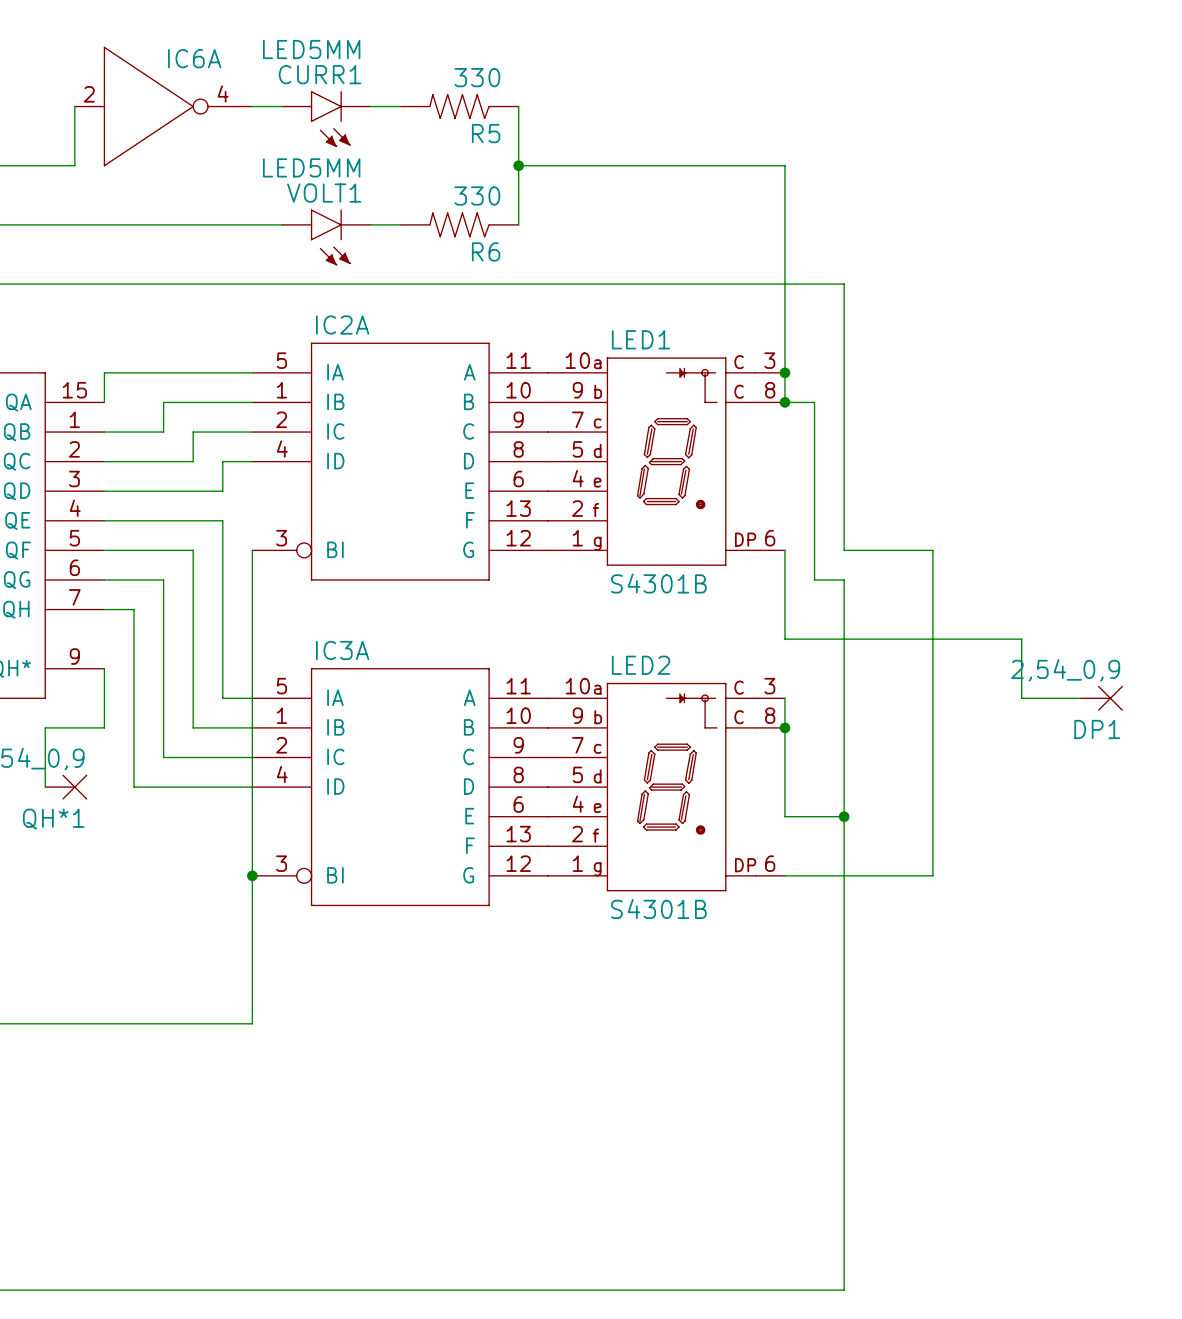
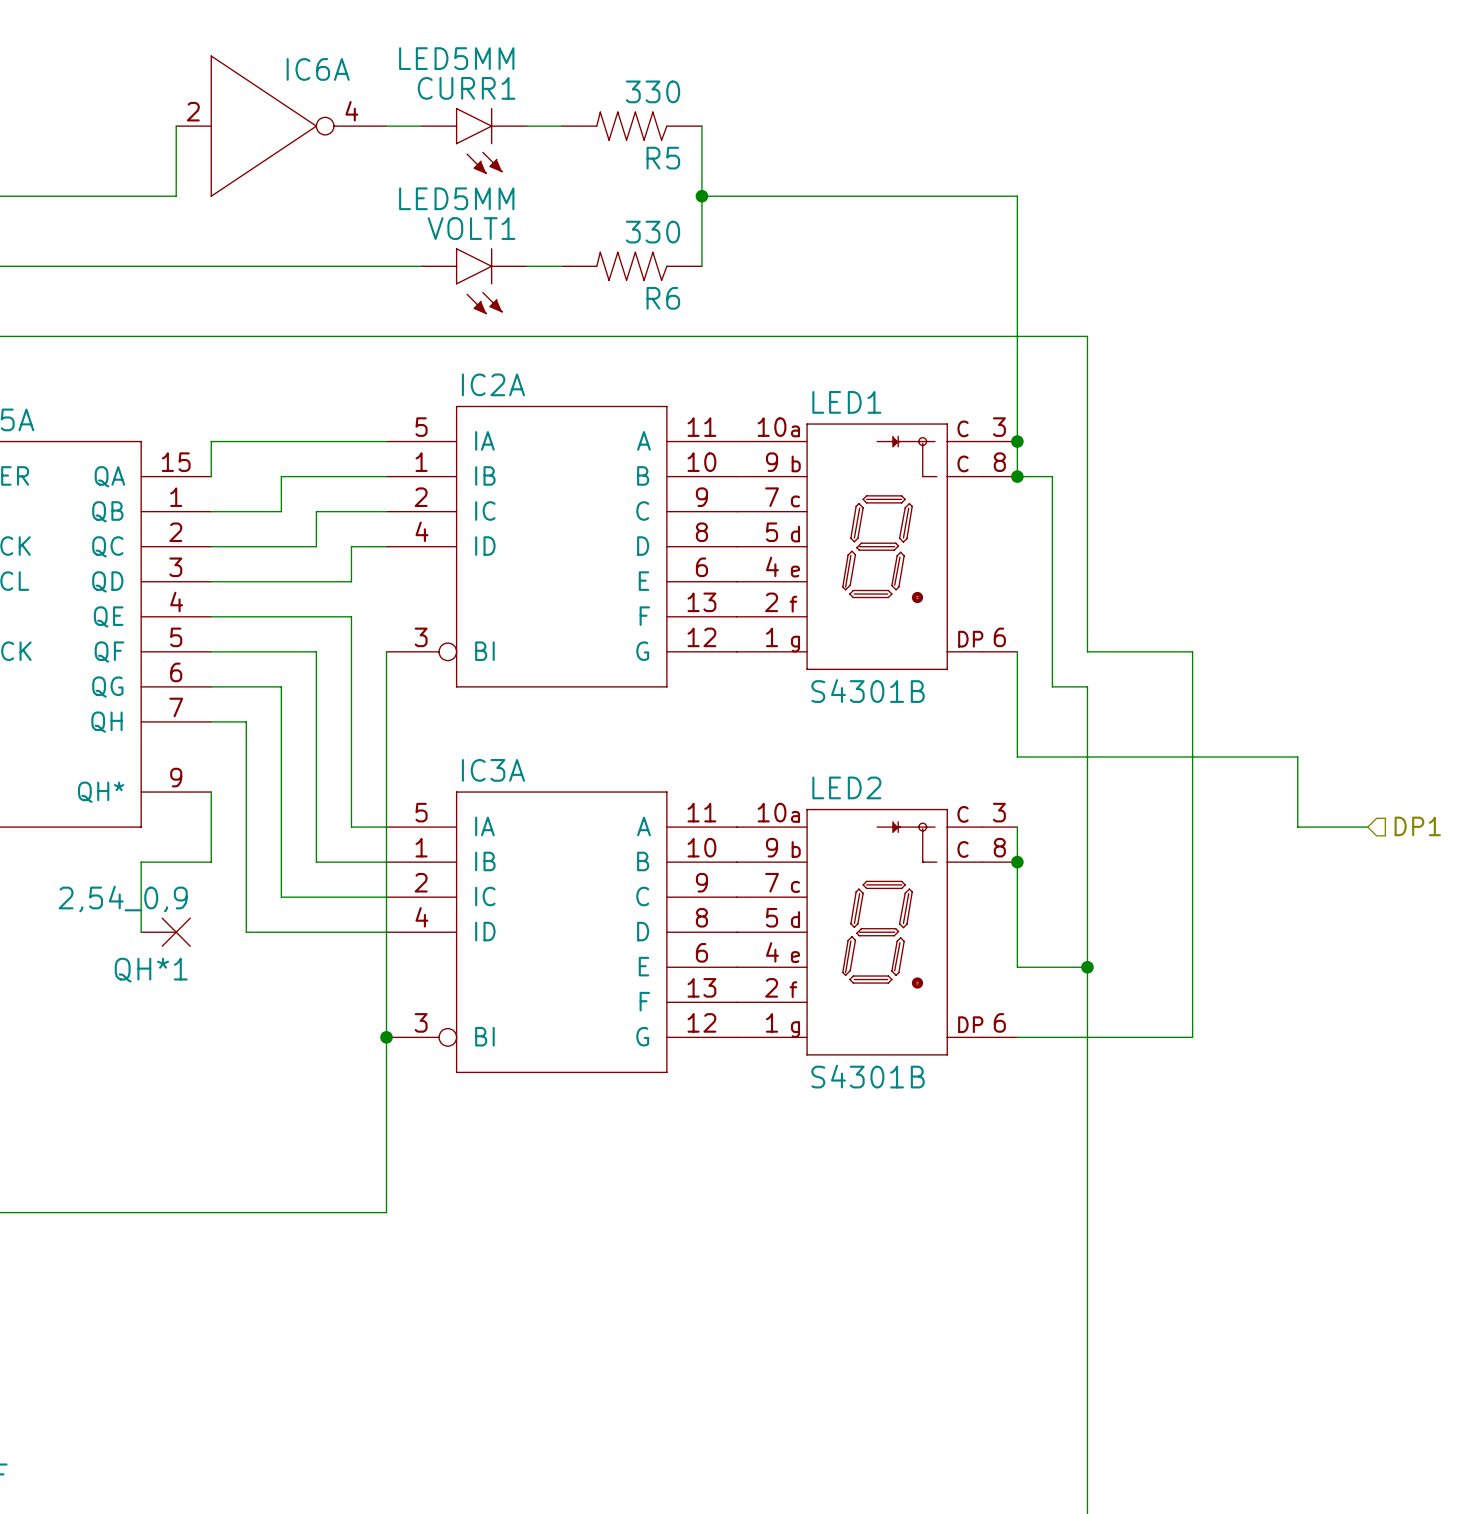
hierarchical label: none -> DP1 (1417, 826)
DP1: 2,54_0,9 (1101, 698) -> none

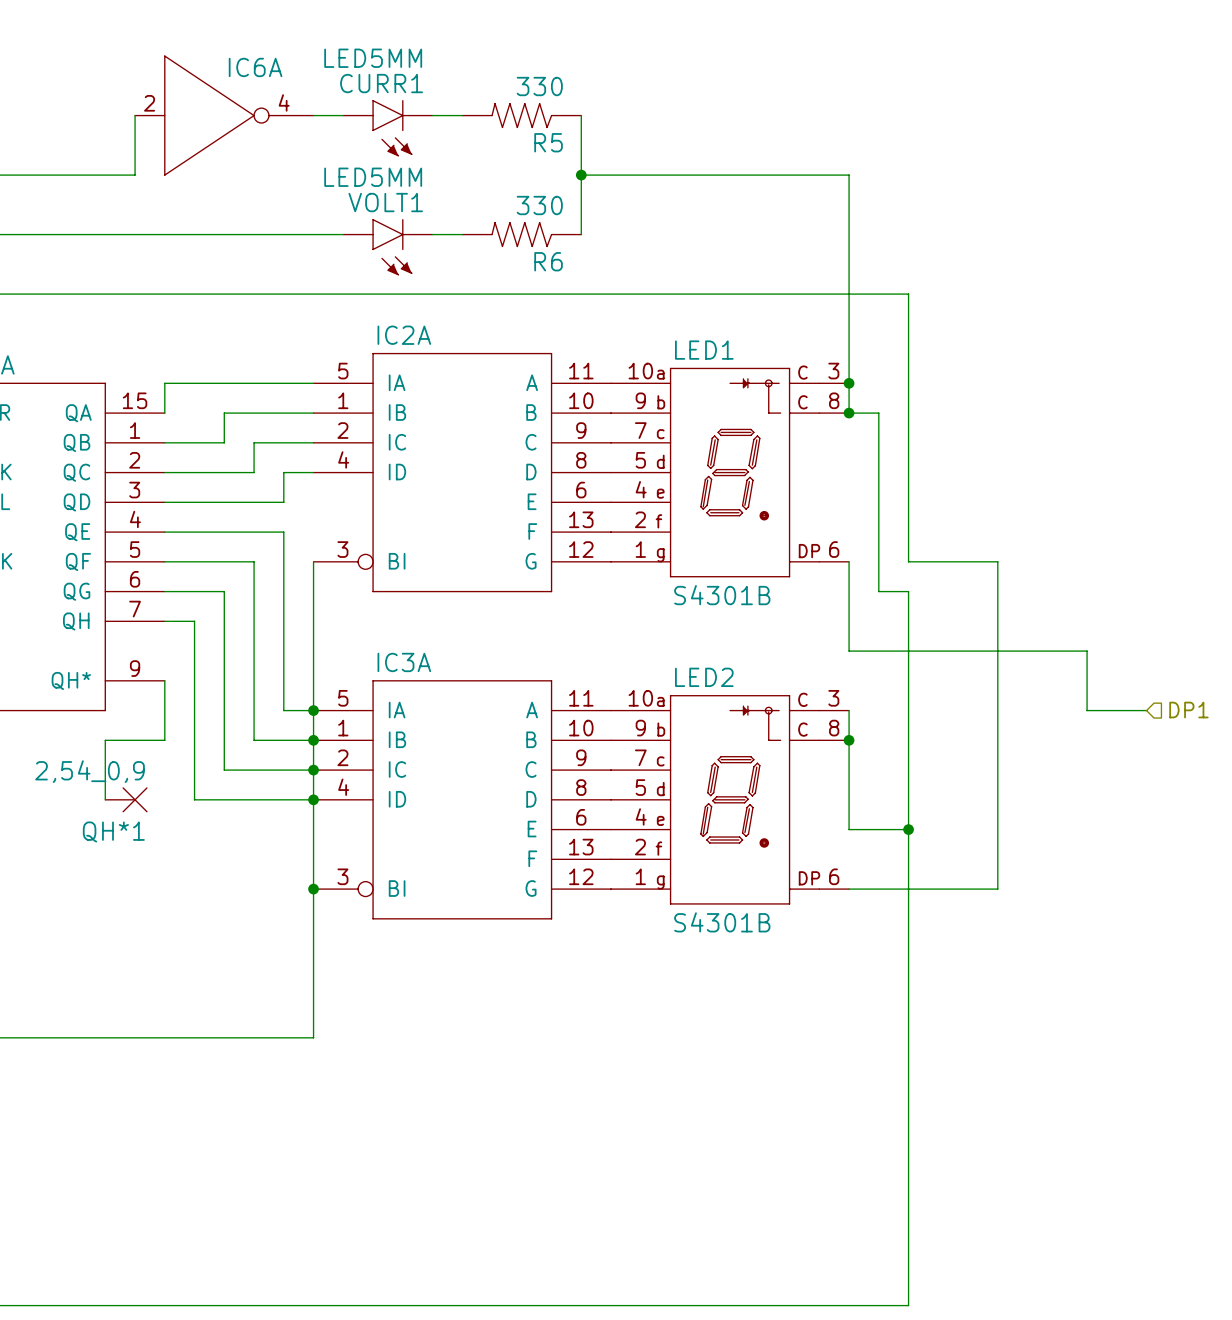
junction: none -> (313, 710)
junction: none -> (313, 740)
junction: none -> (313, 770)
junction: none -> (313, 799)

